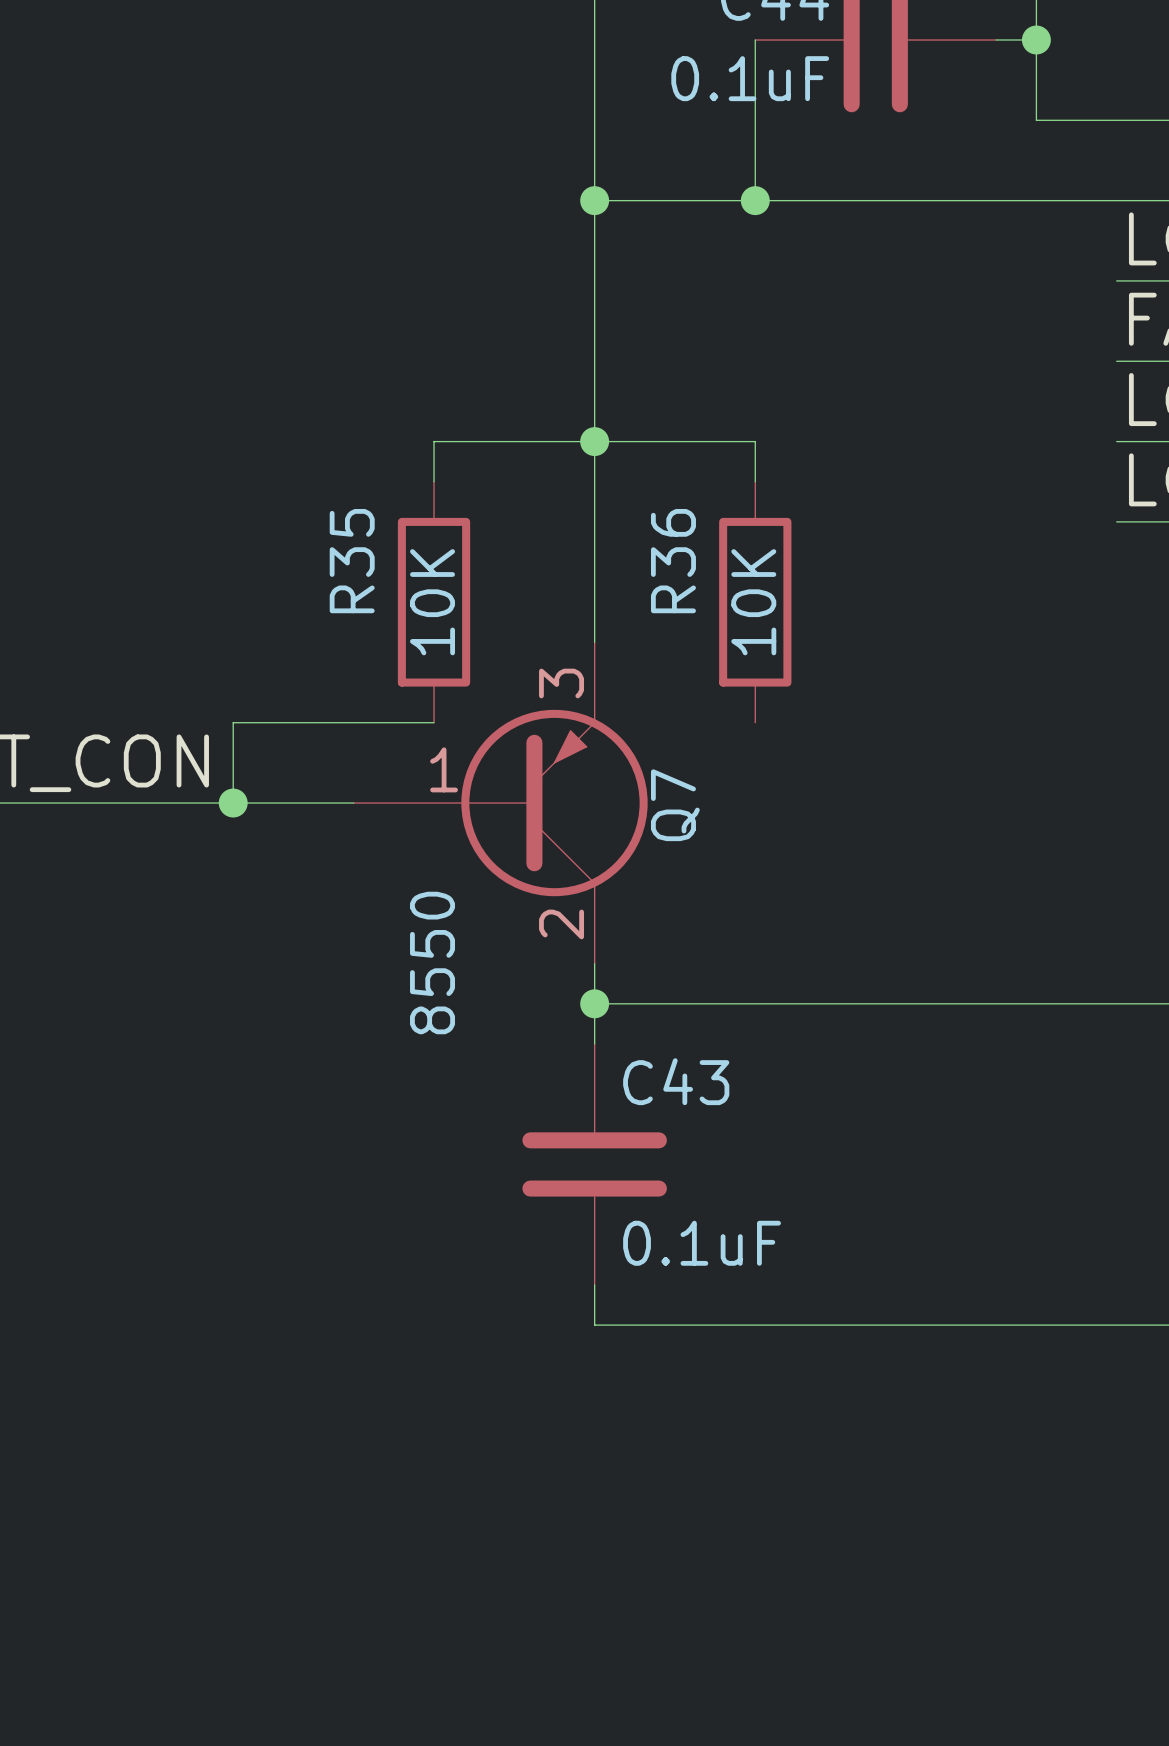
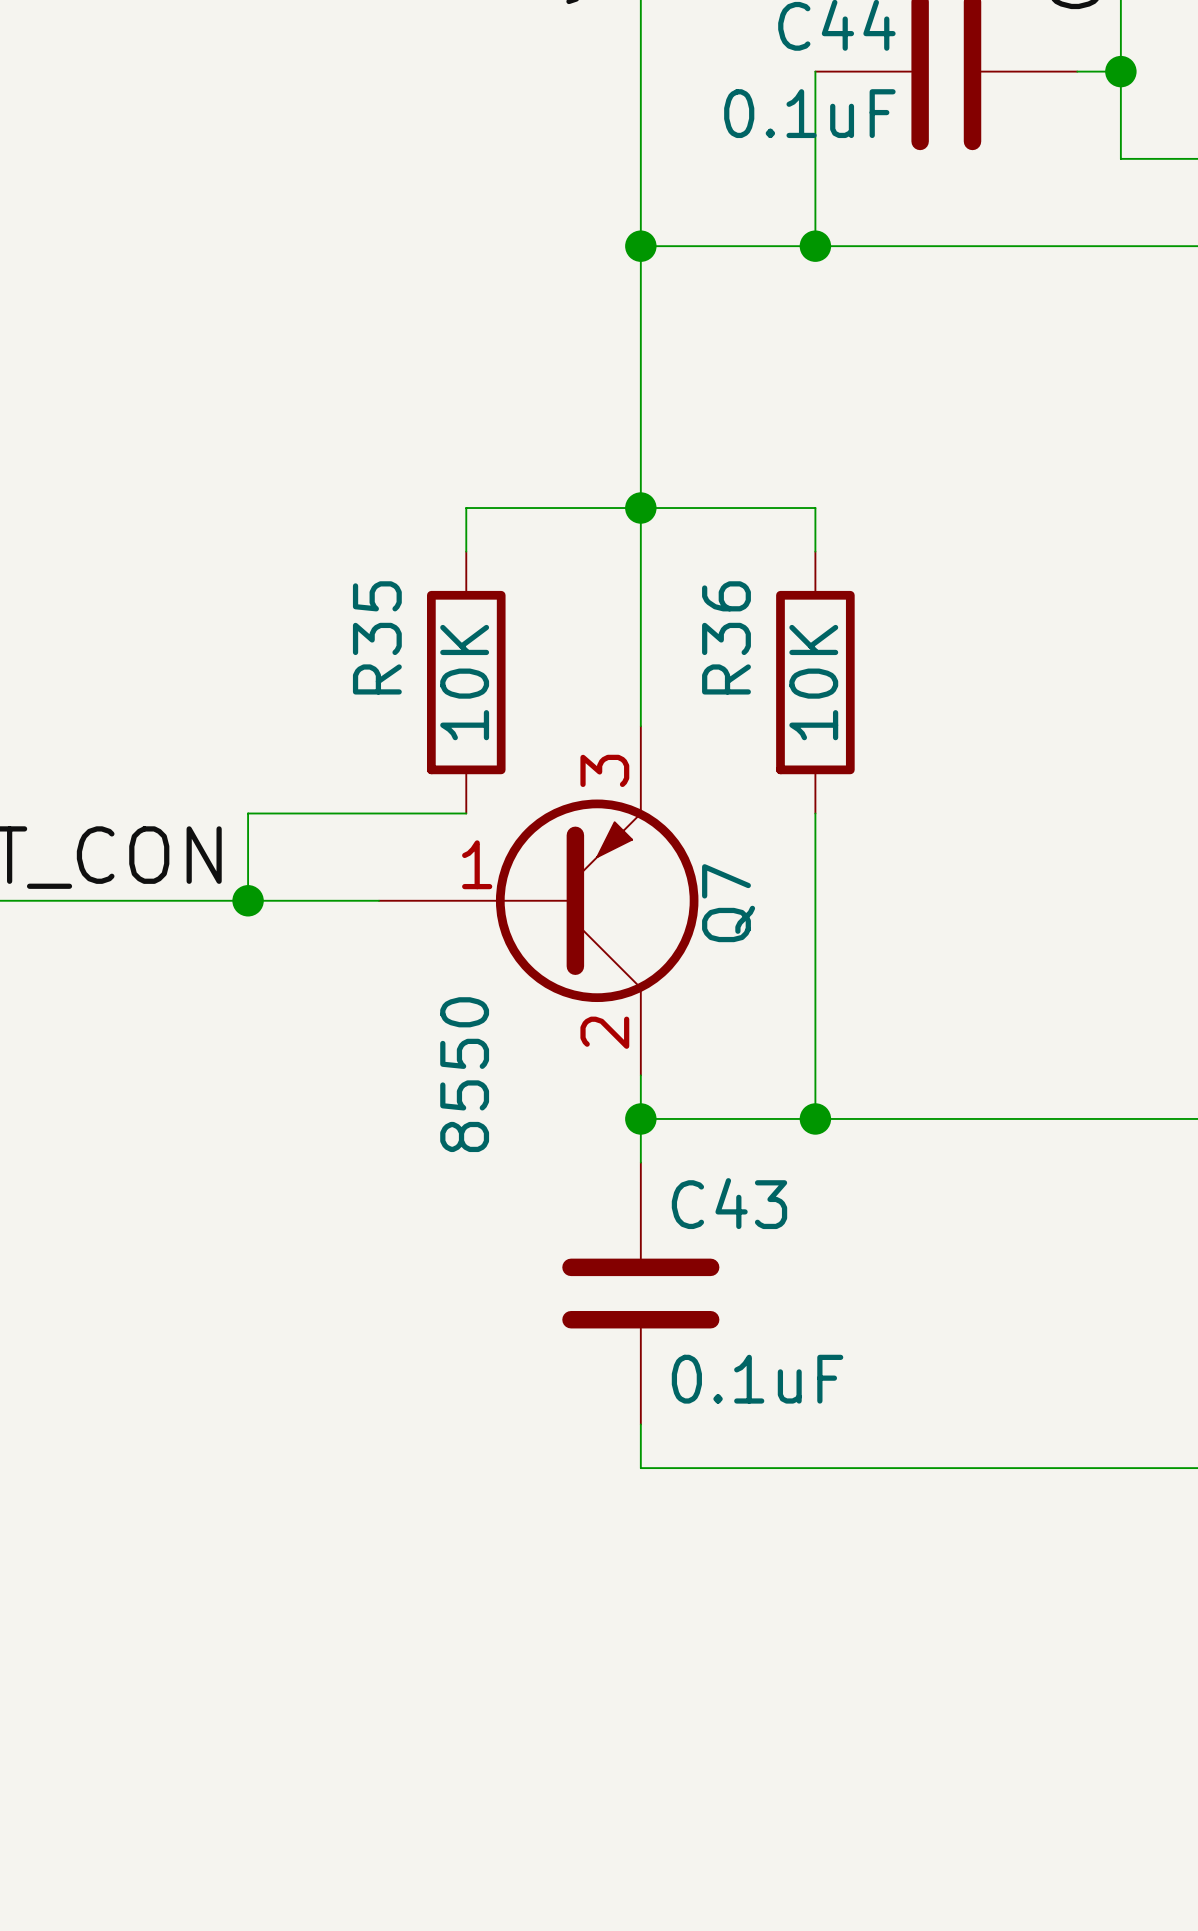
wire: none -> (815, 813) (815, 1118)
junction: none -> (815, 1118)

